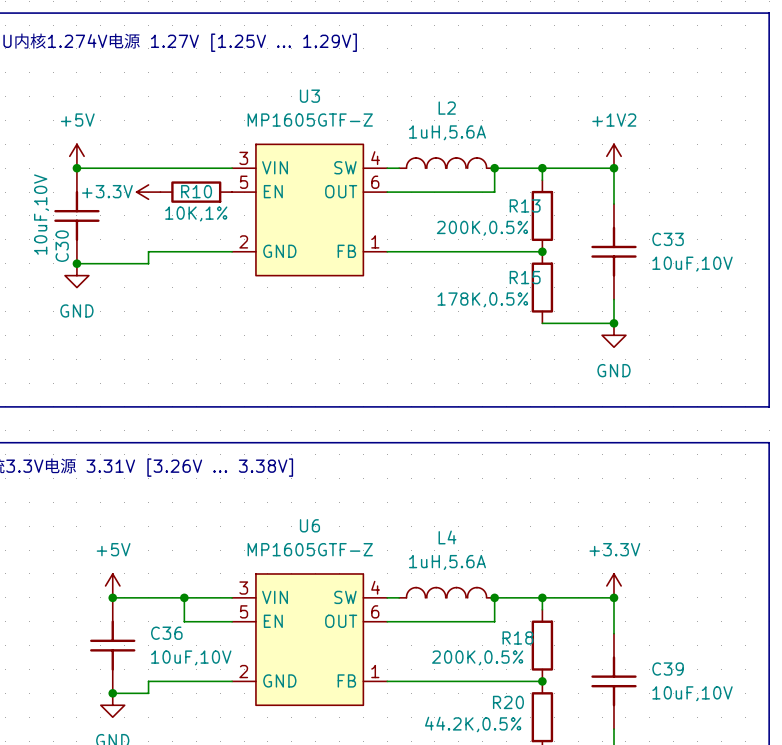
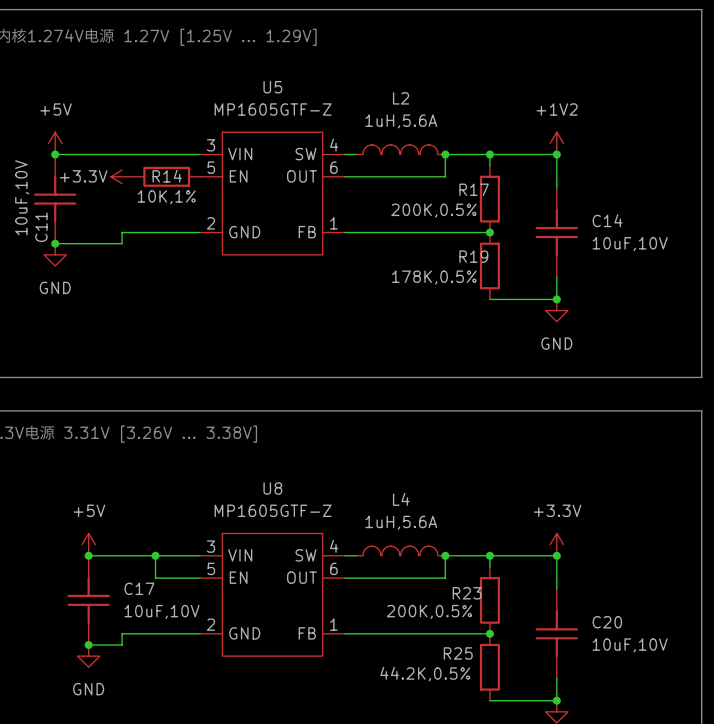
U3 name: U3 (309, 96) -> U5 (272, 87)
R10 name: R10 (196, 191) -> R14 (167, 176)
R13 name: R13 (525, 205) -> R17 (474, 189)
C33 name: C33 (668, 239) -> C14 (607, 220)
C30 name: C30 (62, 246) -> C11 (41, 227)
R15 name: R15 (525, 277) -> R19 (473, 256)
U6 name: U6 (309, 525) -> U8 (272, 488)
C36 name: C36 (166, 633) -> C17 (139, 588)
R18 name: R18 (517, 637) -> R23 (467, 593)
C39 name: C39 (668, 669) -> C20 (607, 622)
R20 name: R20 (508, 702) -> R25 (458, 653)

